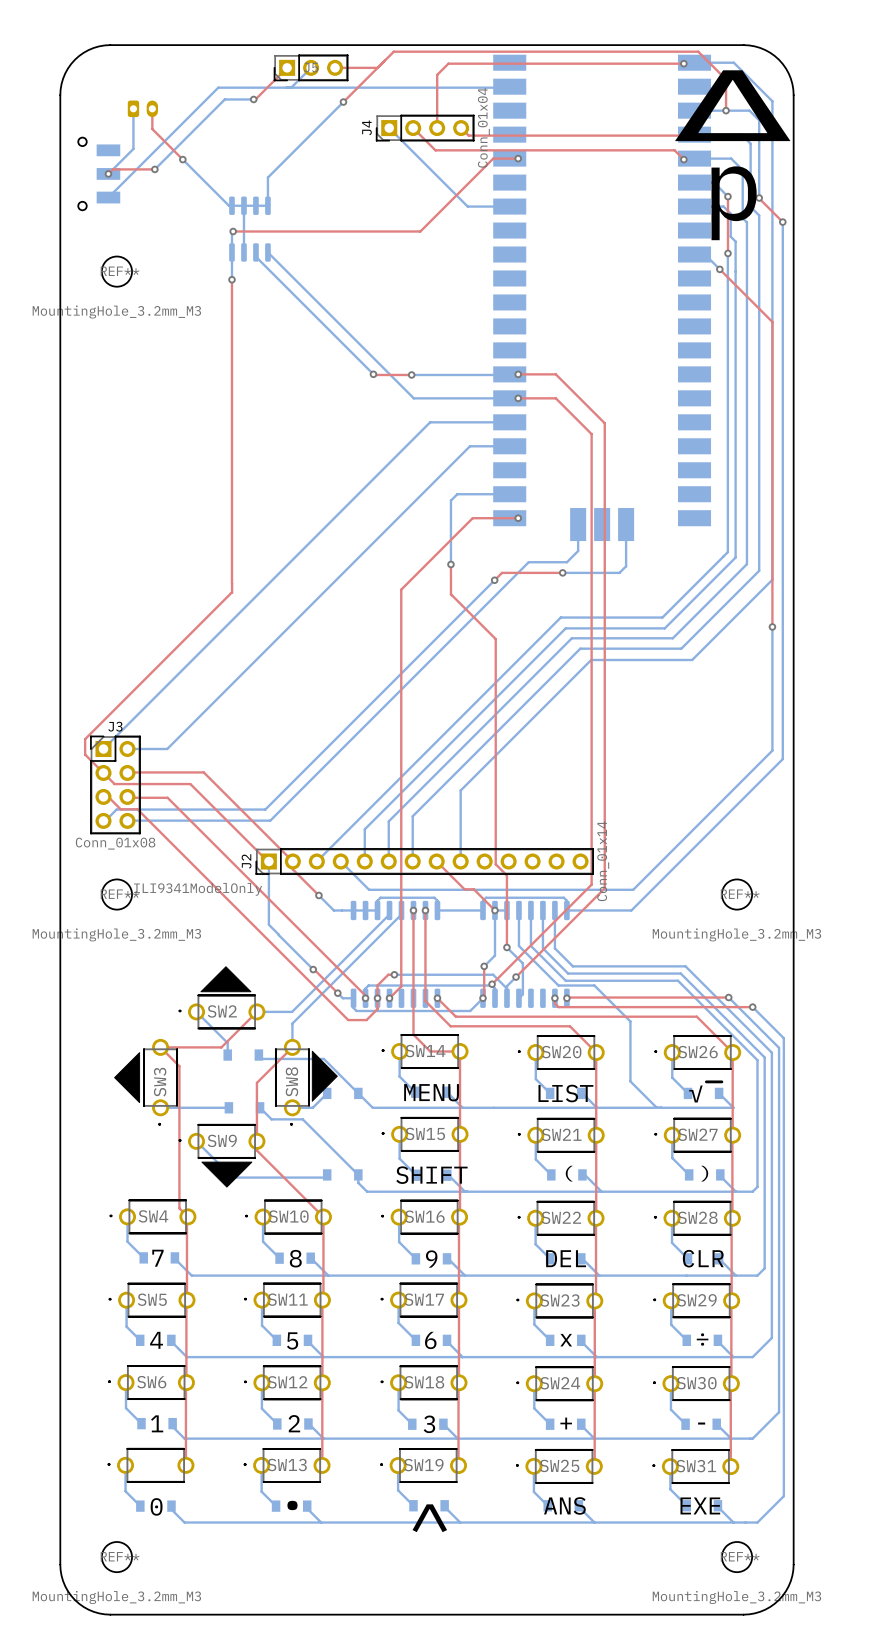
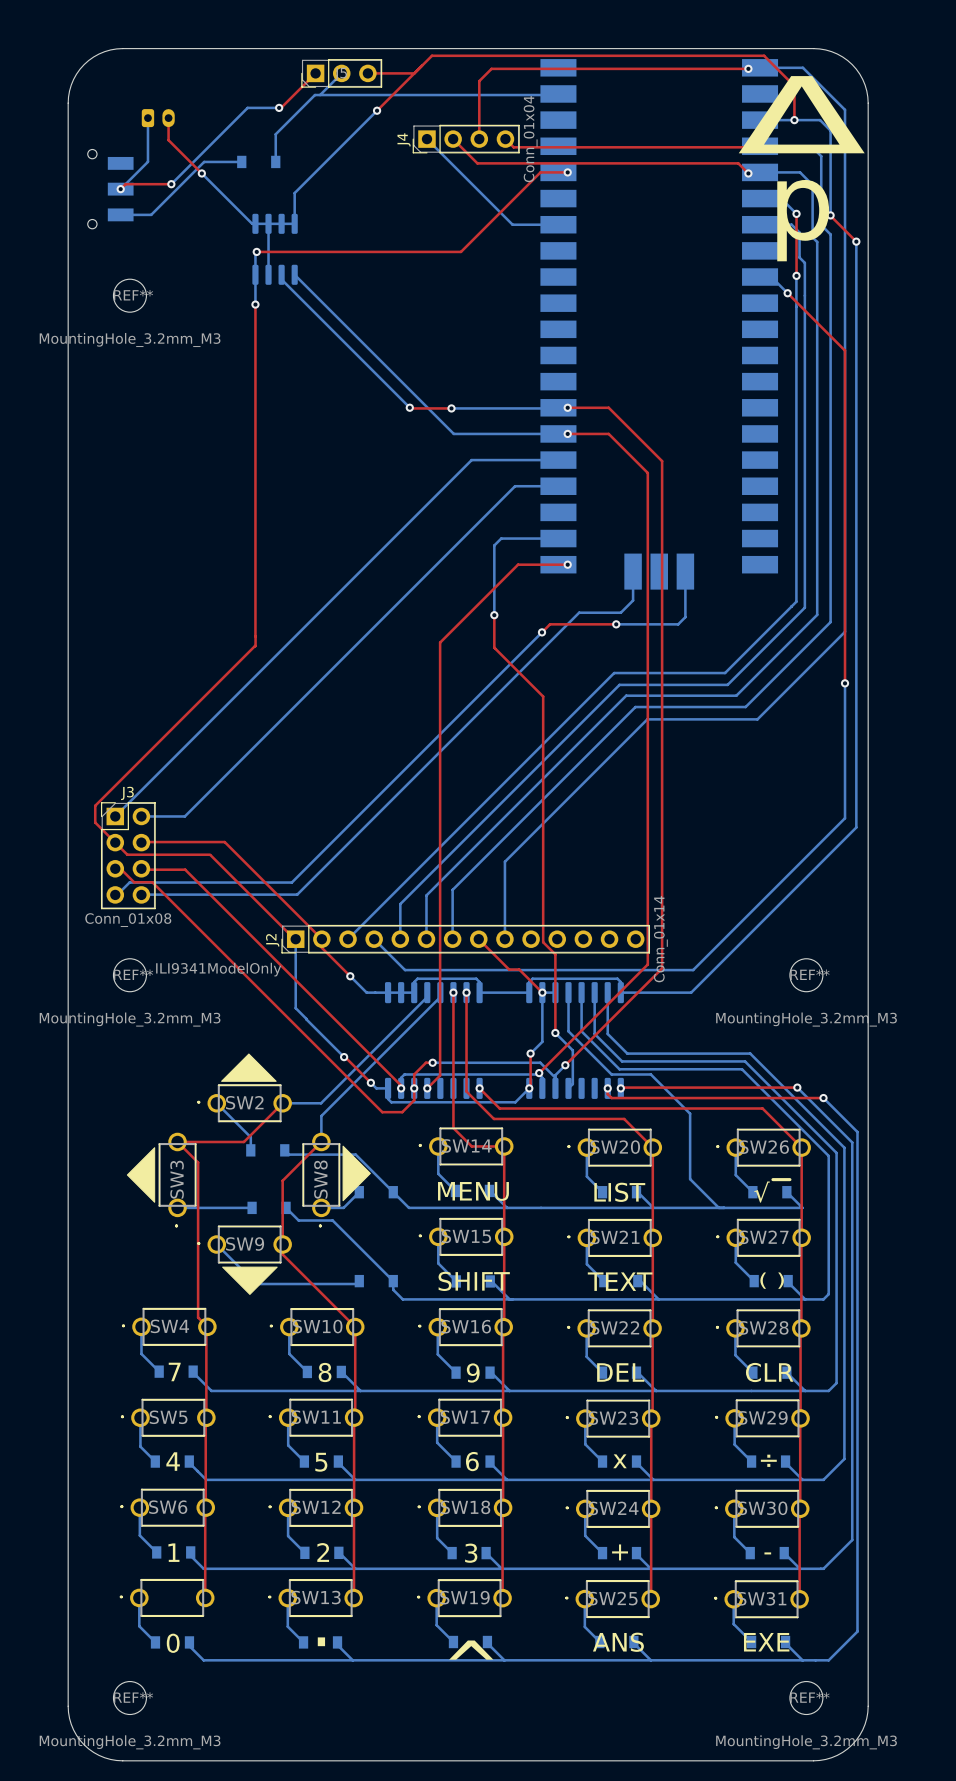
bottom track: (286, 87) (218, 87) (108, 197) -> (241, 161) (204, 161) (151, 214) (120, 214)
bottom track: none -> (314, 95) (275, 134) (275, 161)
part: none -> (258, 161)
text: ( (569, 1173) -> TEXT (620, 1281)
text: ) (704, 1173) -> ( ) (772, 1280)

